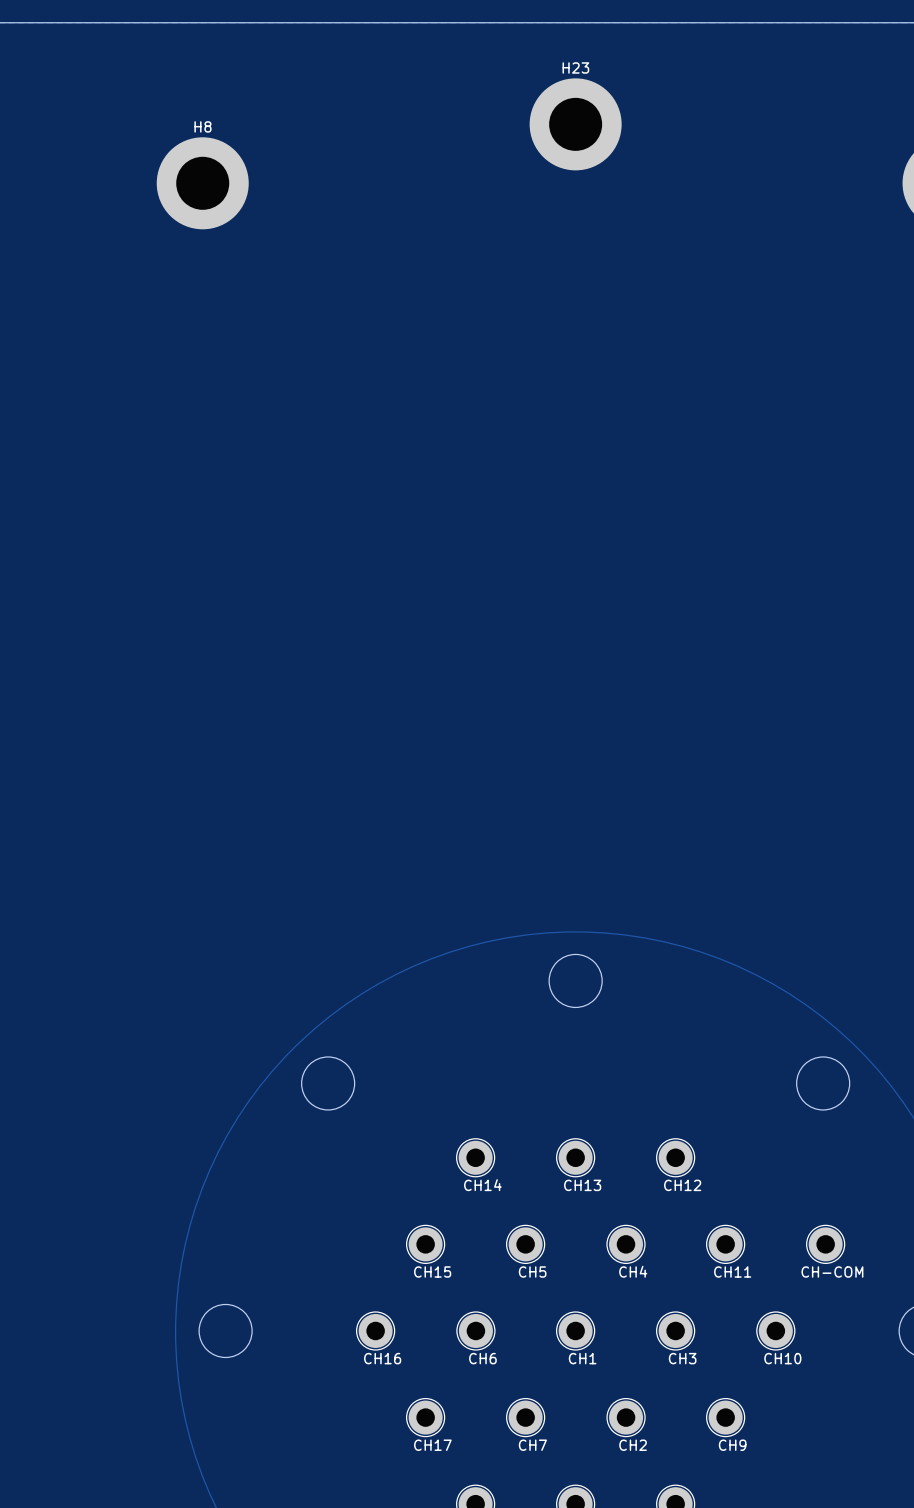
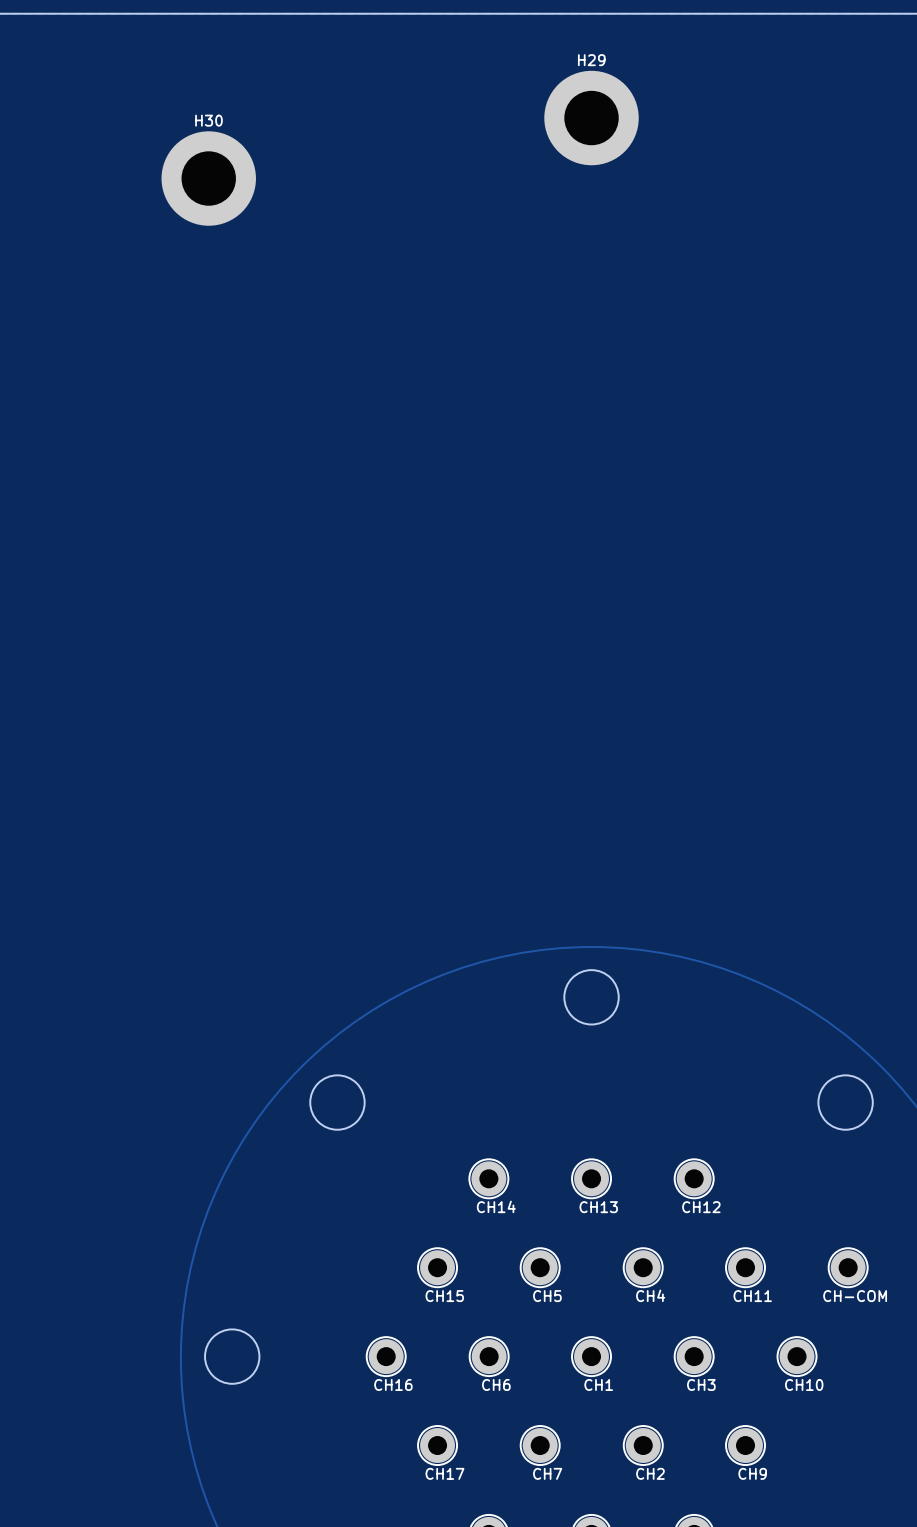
H23 name: H23 (575, 67) -> H29 (591, 60)
H8 name: H8 (202, 126) -> H30 (208, 120)

